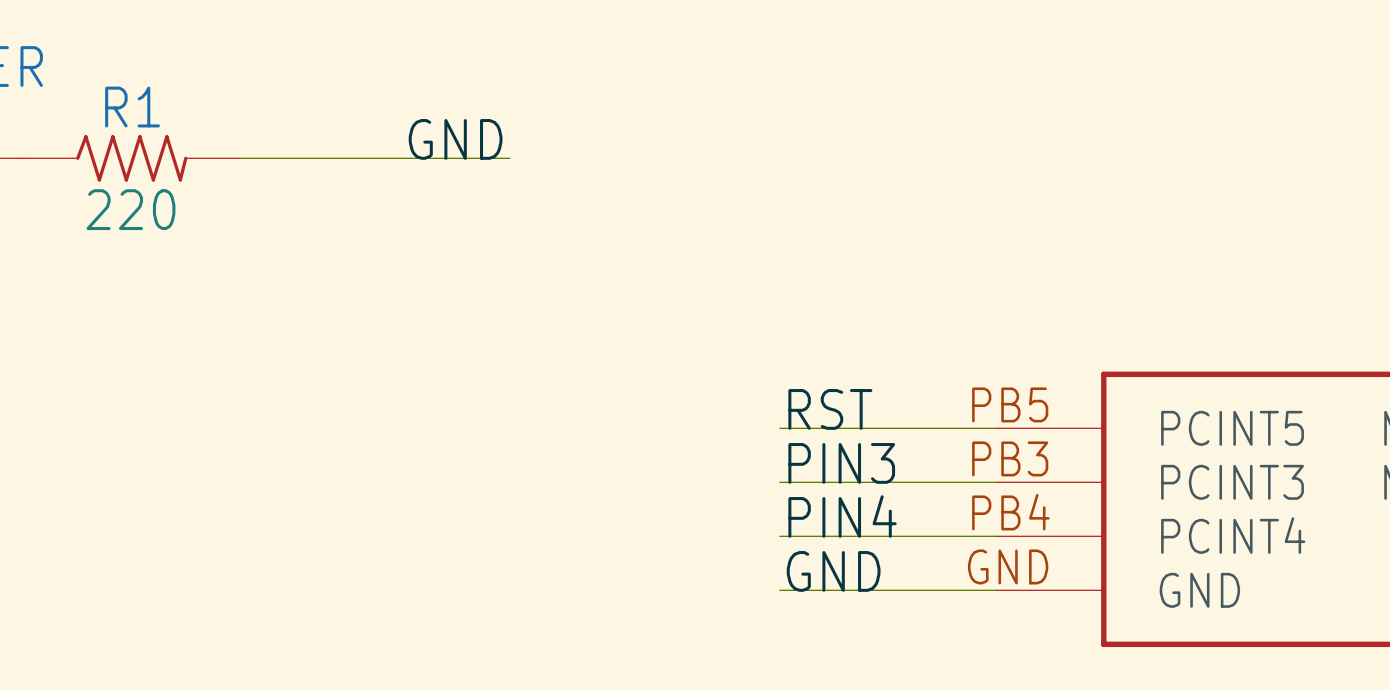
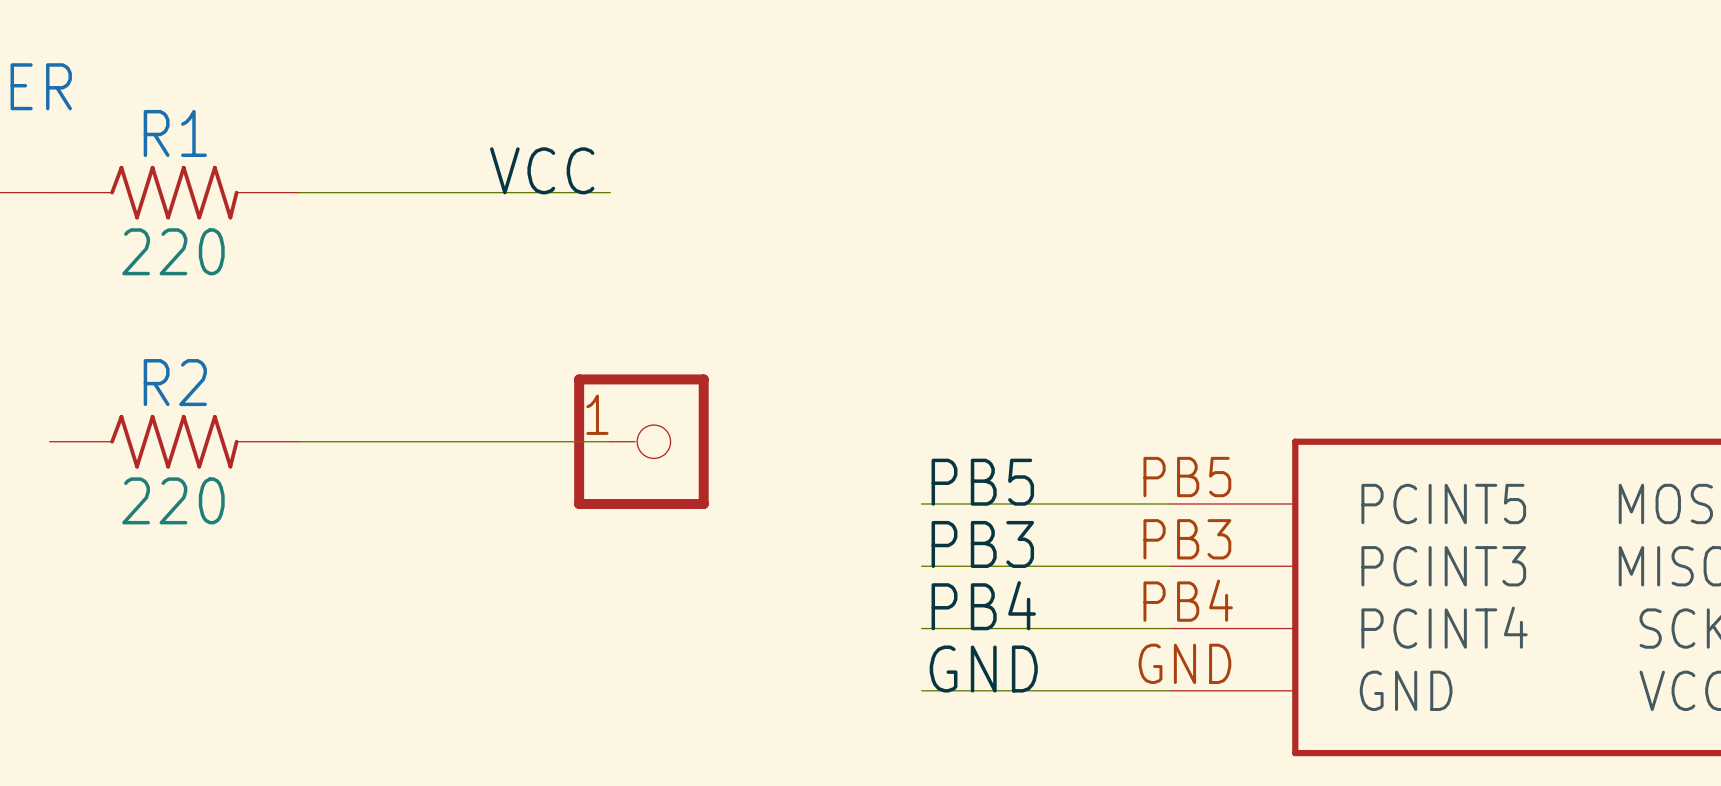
label: GND (455, 139) -> VCC (542, 170)
R2: none -> 220 (174, 441)
wire: none -> (298, 441) (610, 441)
part: none -> (641, 441)
label: RST (830, 409) -> PB5 (982, 482)
label: PIN3 (841, 463) -> PB3 (982, 544)
label: PIN4 (842, 516) -> PB4 (983, 605)

